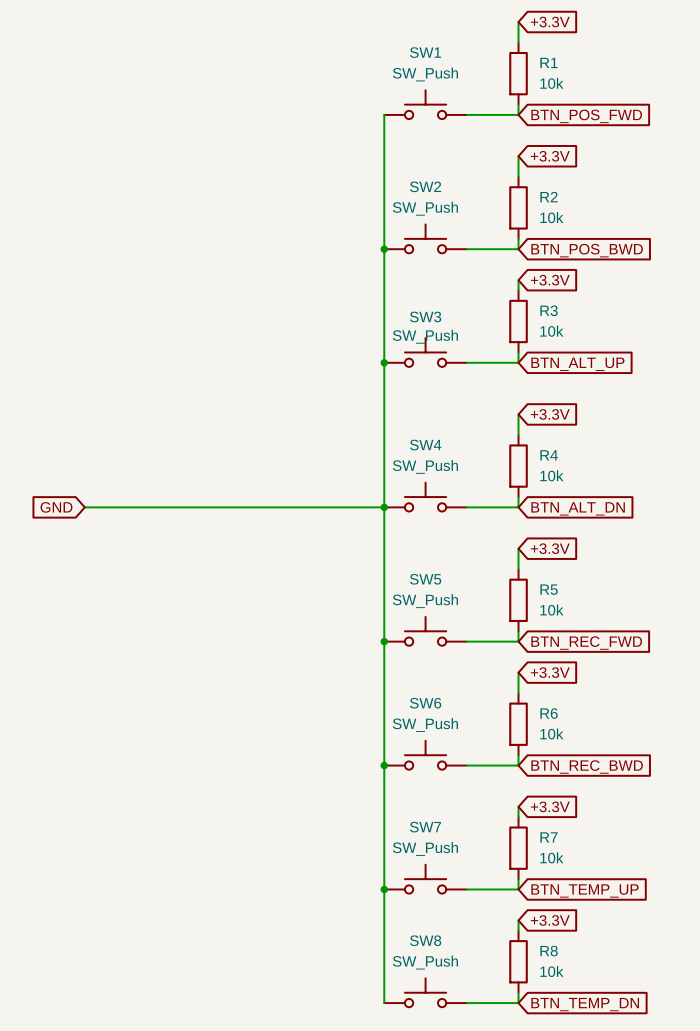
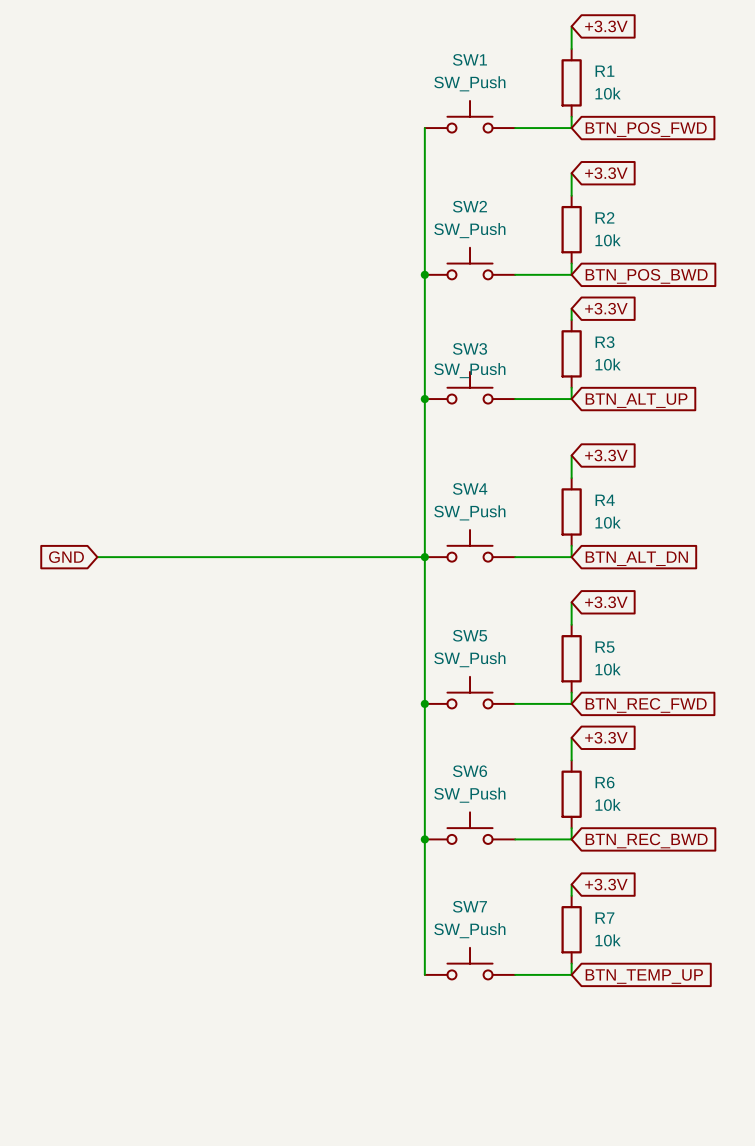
wire: (384, 889) (384, 1003) -> none
junction: (384, 889) -> none
wire: (518, 920) (518, 930) -> none
global label: +3.3V (550, 920) -> none
R8: 10k (518, 961) -> none
SW8: SW_Push (425, 992) -> none
wire: (518, 992) (518, 1003) (466, 1003) -> none
global label: BTN_TEMP_DN (585, 1004) -> none

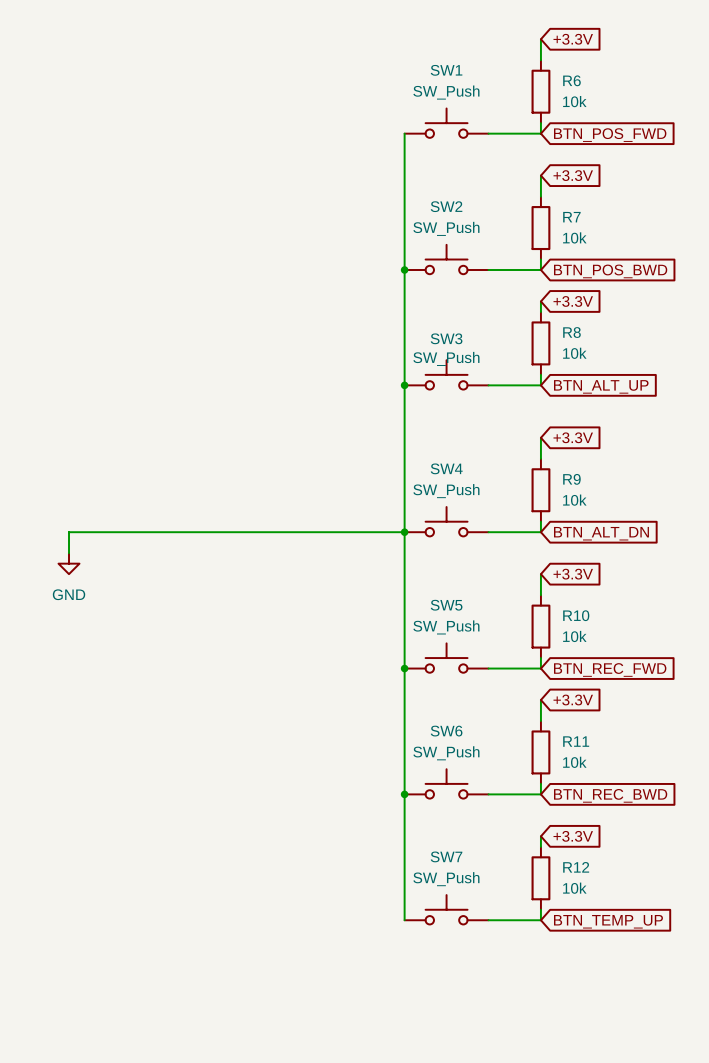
R1 name: R1 (604, 71) -> R6 (571, 80)
R2 name: R2 (604, 217) -> R7 (571, 217)
R3 name: R3 (605, 342) -> R8 (571, 332)
R4 name: R4 (605, 500) -> R9 (571, 479)
global label: GND (66, 557) -> none
wire: none -> (100, 532) (69, 532) (69, 553)
power symbol: none -> GND (69, 563)
R5 name: R5 (605, 647) -> R10 (576, 615)
R6 name: R6 (605, 782) -> R11 (576, 741)
R7 name: R7 (604, 918) -> R12 (576, 867)

